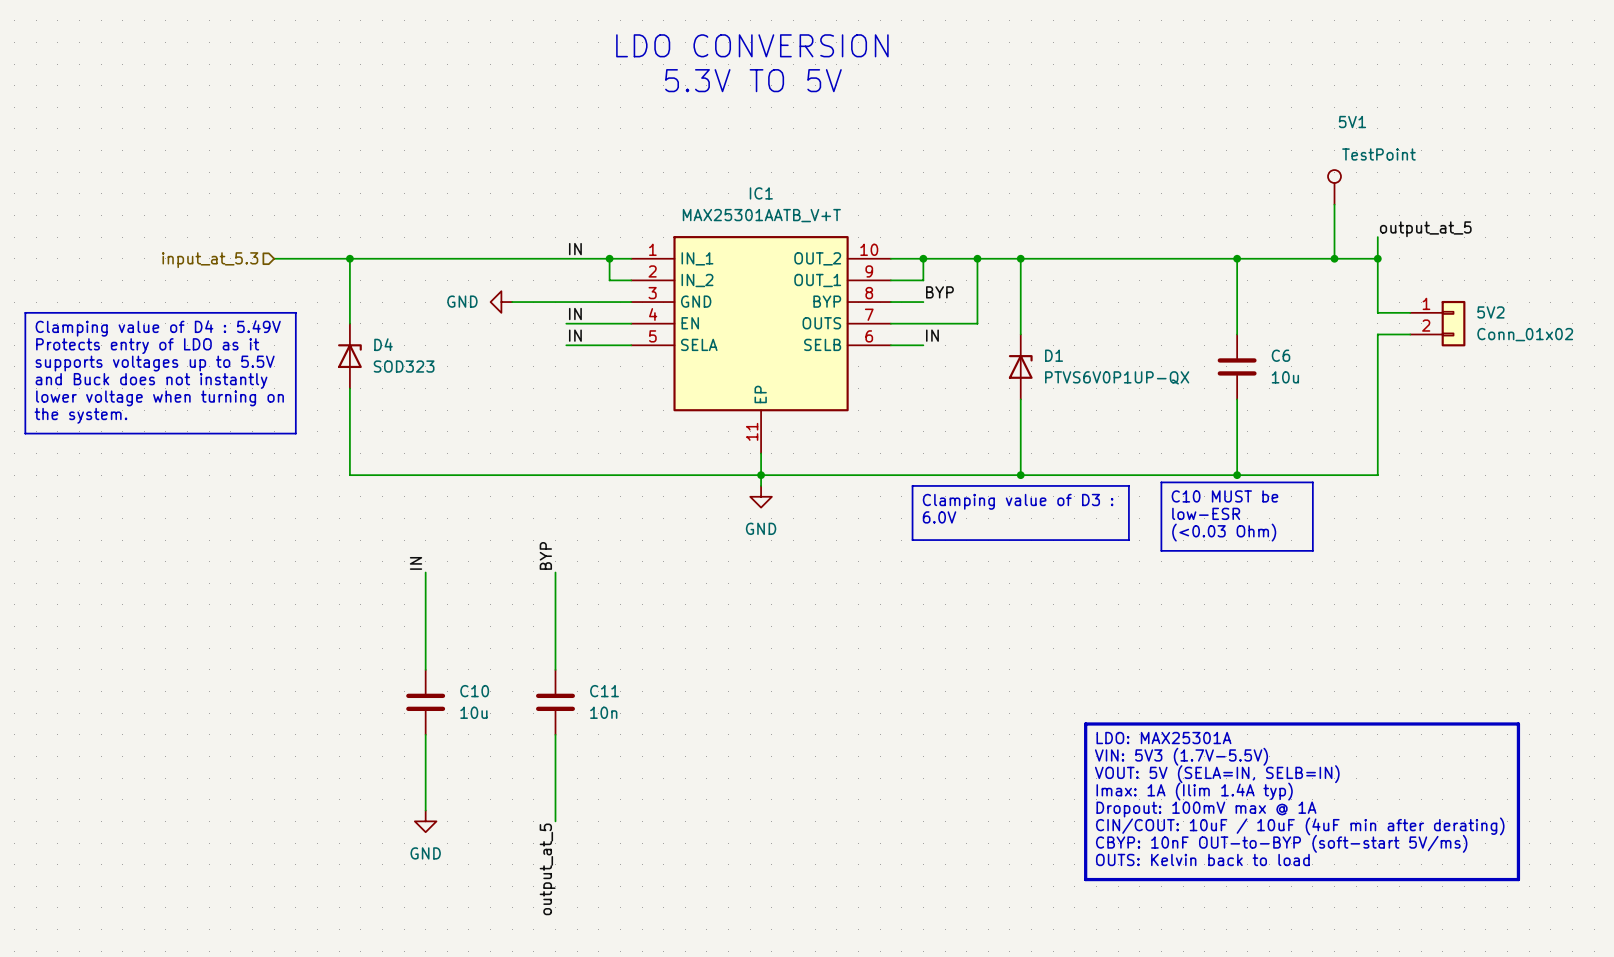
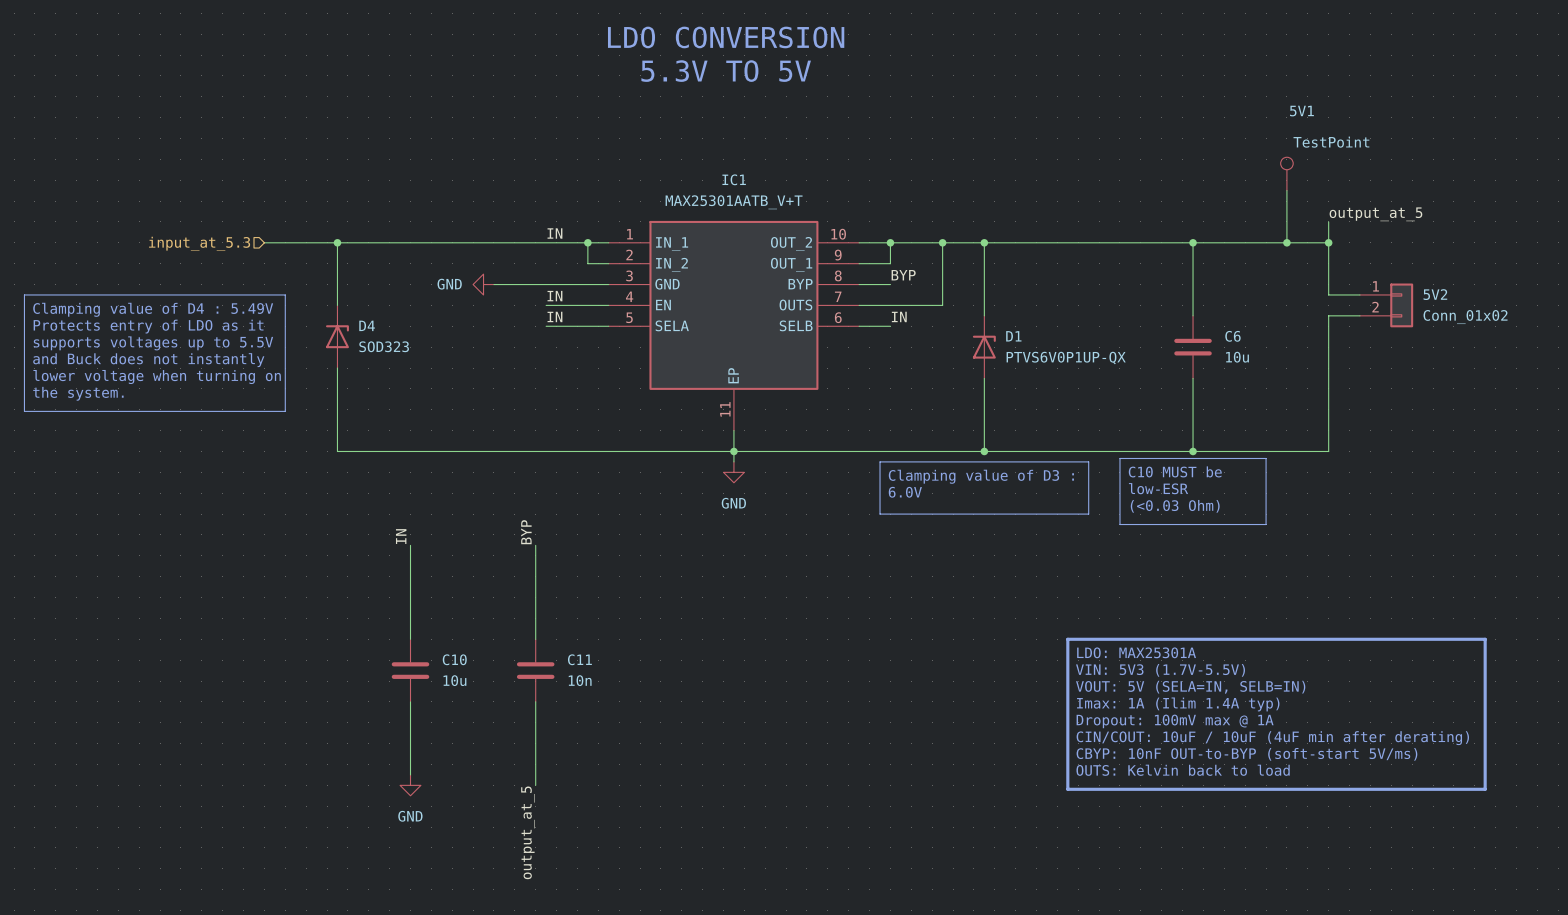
line: (1085, 723) (1518, 723) (1518, 879) (1085, 879) (1085, 723) -> (1067, 639) (1485, 639) (1485, 789) (1067, 789) (1067, 639)
text position: LDO: MAX25301A (1163, 738) -> LDO: MAX25301A (1136, 652)
text position: VIN: 5V3 (1.7V-5.5V) (1181, 756) -> VIN: 5V3 (1.7V-5.5V) (1160, 670)
text position: VOUT: 5V (SELA=IN, SELB=IN) (1217, 774) -> VOUT: 5V (SELA=IN, SELB=IN) (1190, 687)
text position: Imax: 1A (Ilim 1.4A typ) (1194, 791) -> Imax: 1A (Ilim 1.4A typ) (1178, 704)
text position: Dropout: 100mV max @ 1A (1206, 809) -> Dropout: 100mV max @ 1A (1175, 721)
text position: CIN/COUT: 10uF / 10uF (4uF min after derating) (1300, 826) -> CIN/COUT: 10uF / 10uF (4uF min after derating) (1272, 738)
text position: CBYP: 10nF OUT-to-BYP (soft-start 5V/ms) (1281, 843) -> CBYP: 10nF OUT-to-BYP (soft-start 5V/ms) (1246, 754)
text position: OUTS: Kelvin back to load (1202, 859) -> OUTS: Kelvin back to load (1183, 770)

